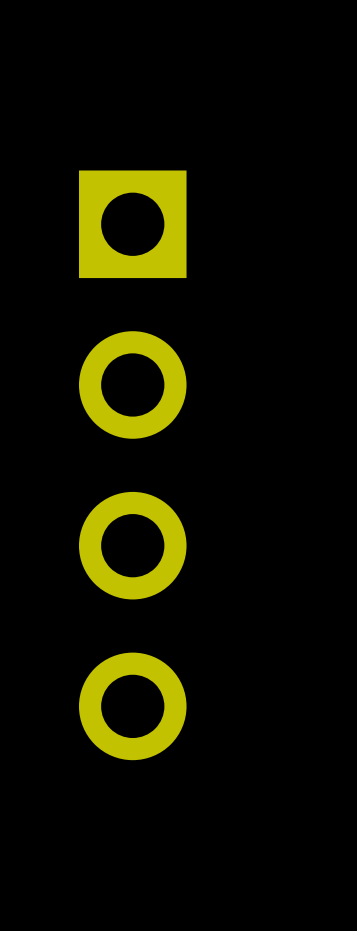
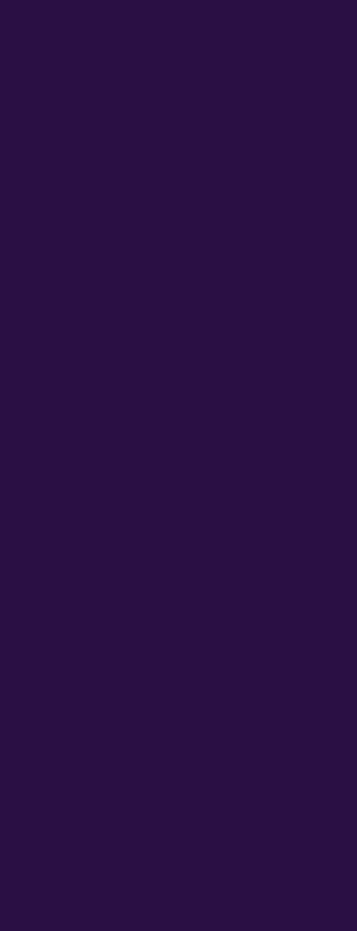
part: (132, 465) -> none

